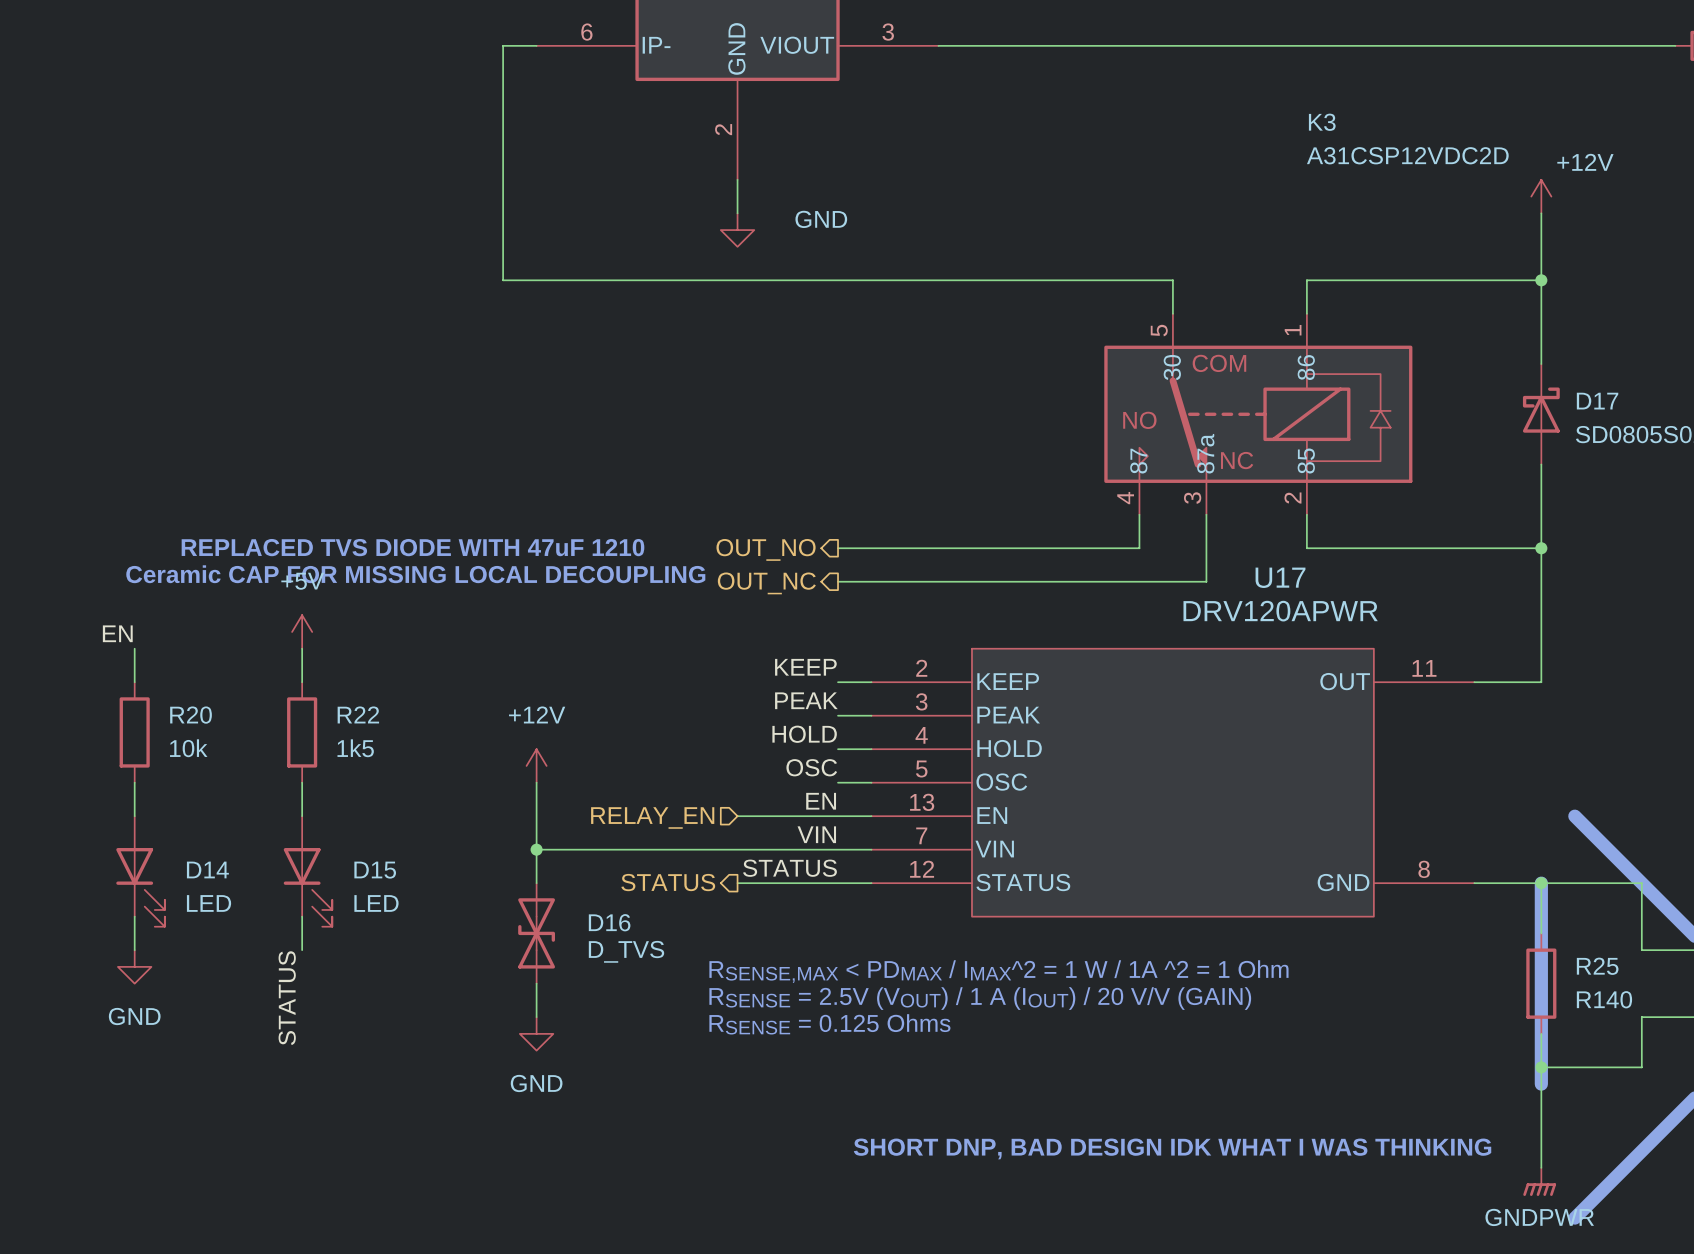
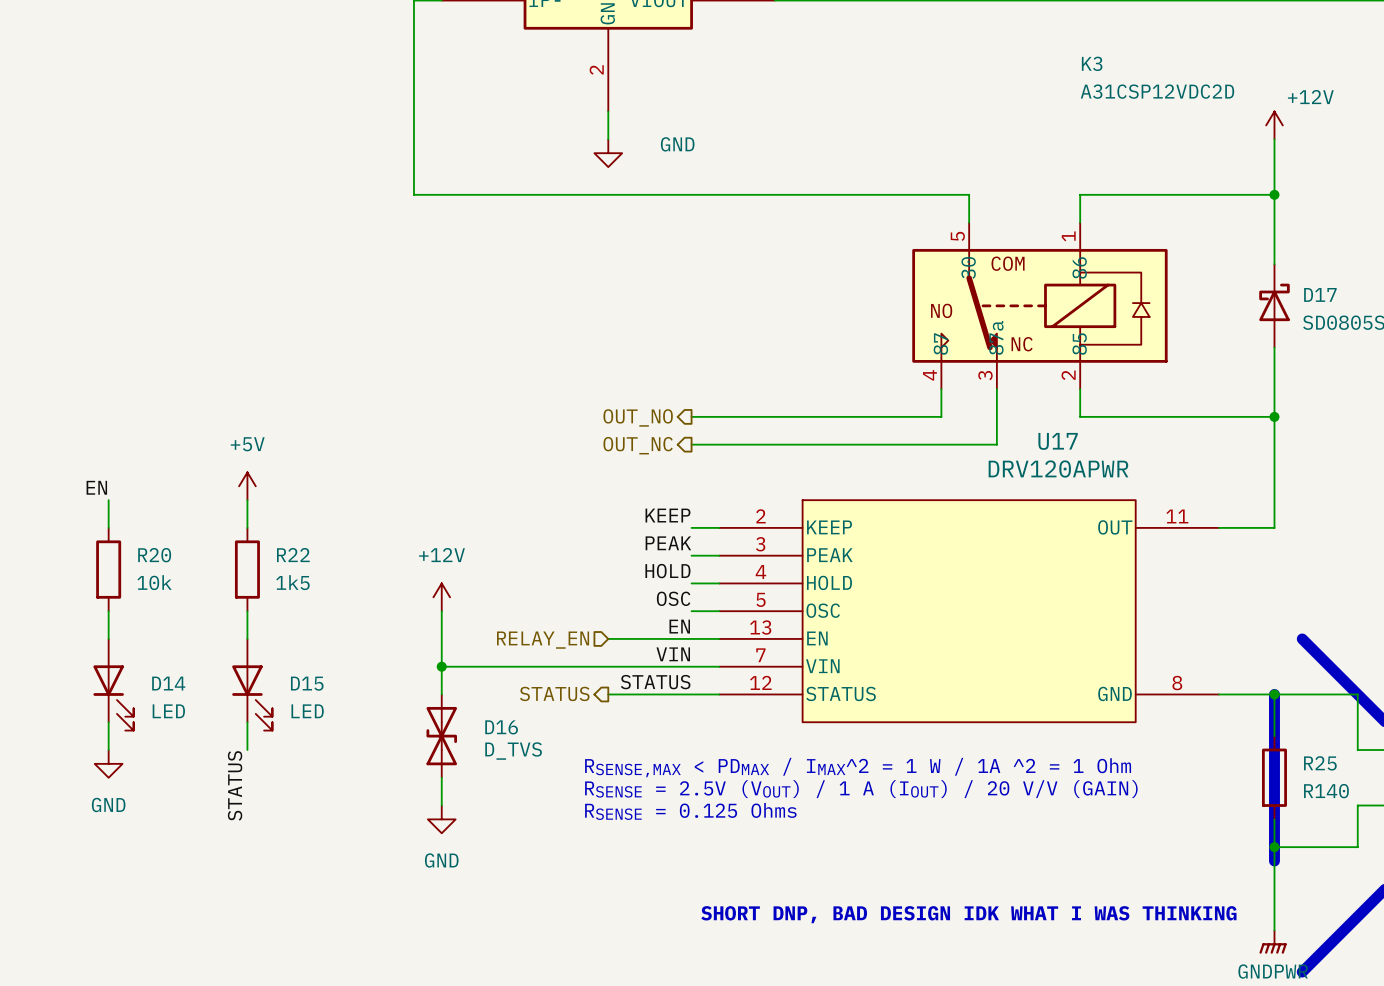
text: REPLACED TVS DIODE WITH 47uF 1210 (412, 547) -> none
text: Ceramic CAP FOR MISSING LOCAL DECOUPLING (415, 574) -> none

